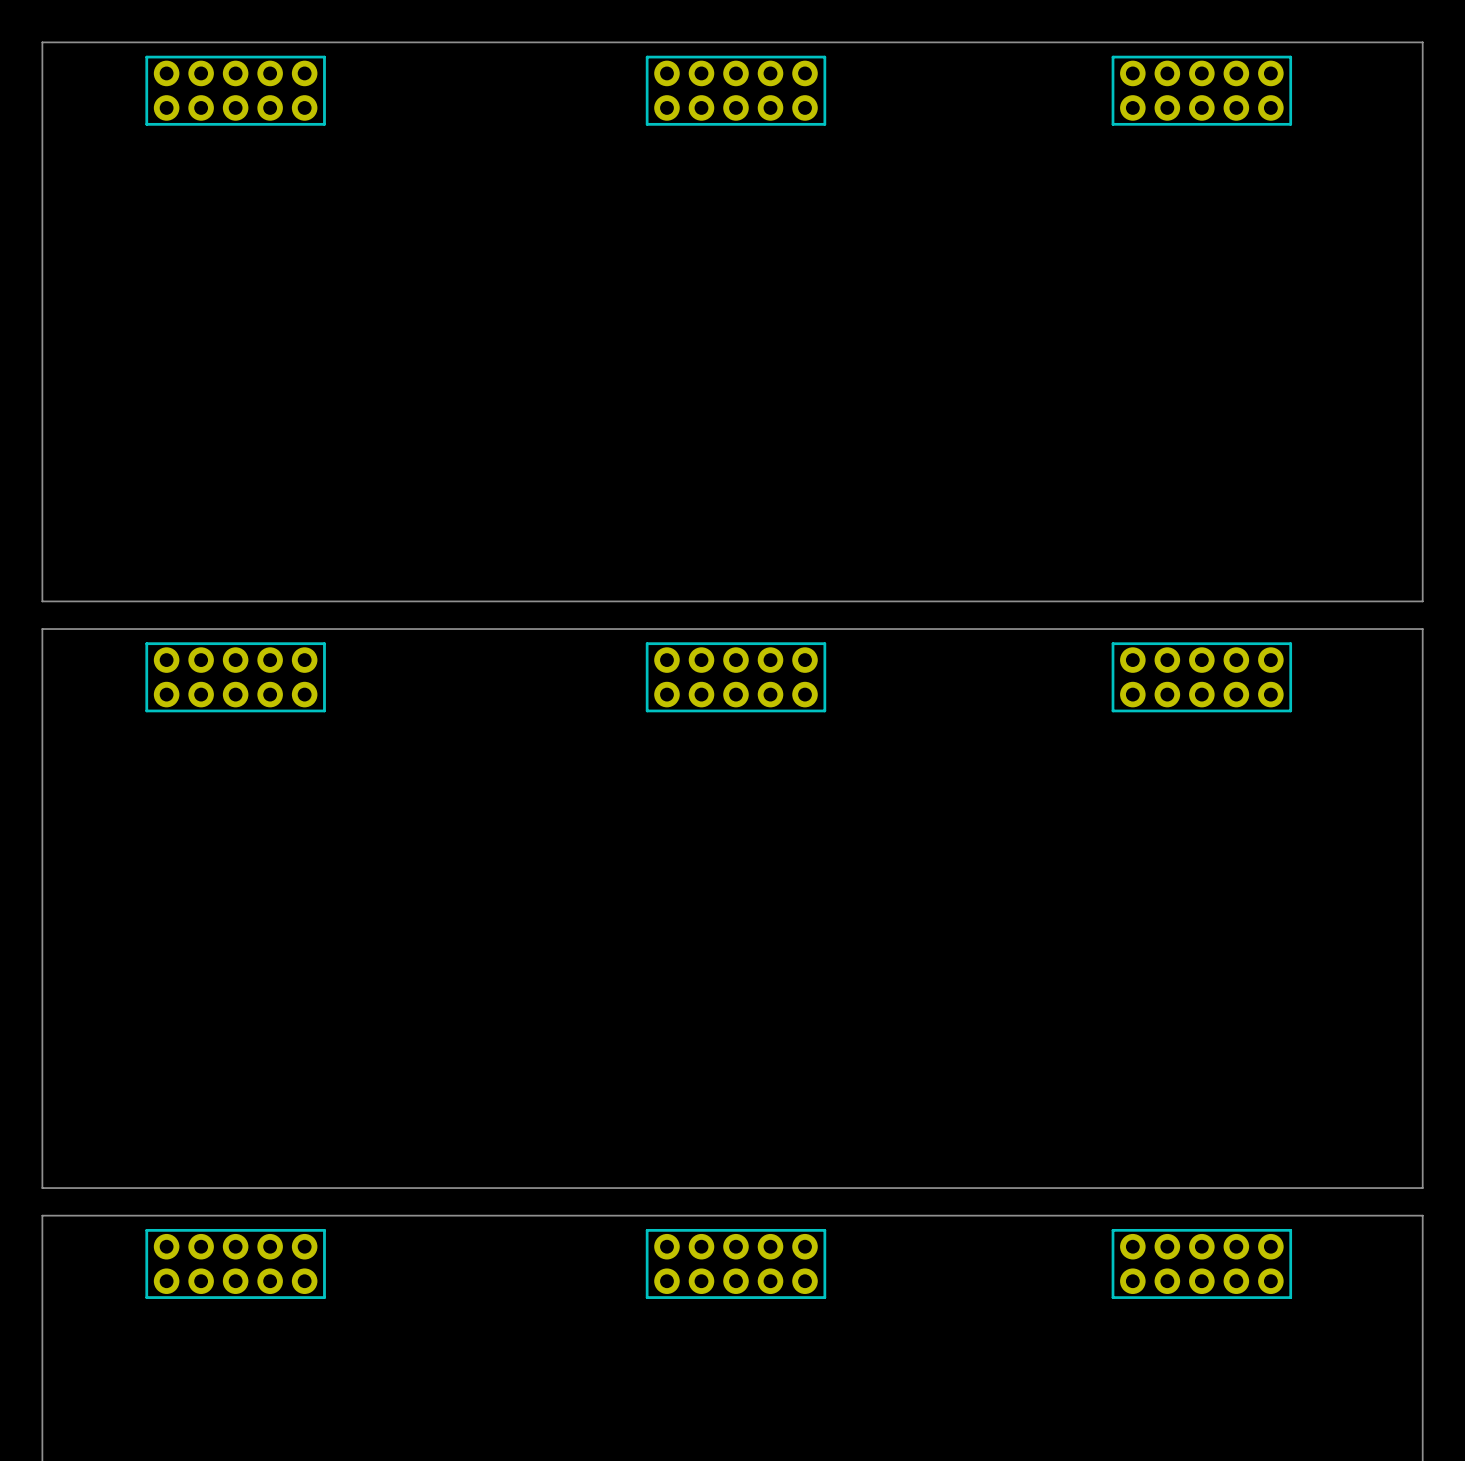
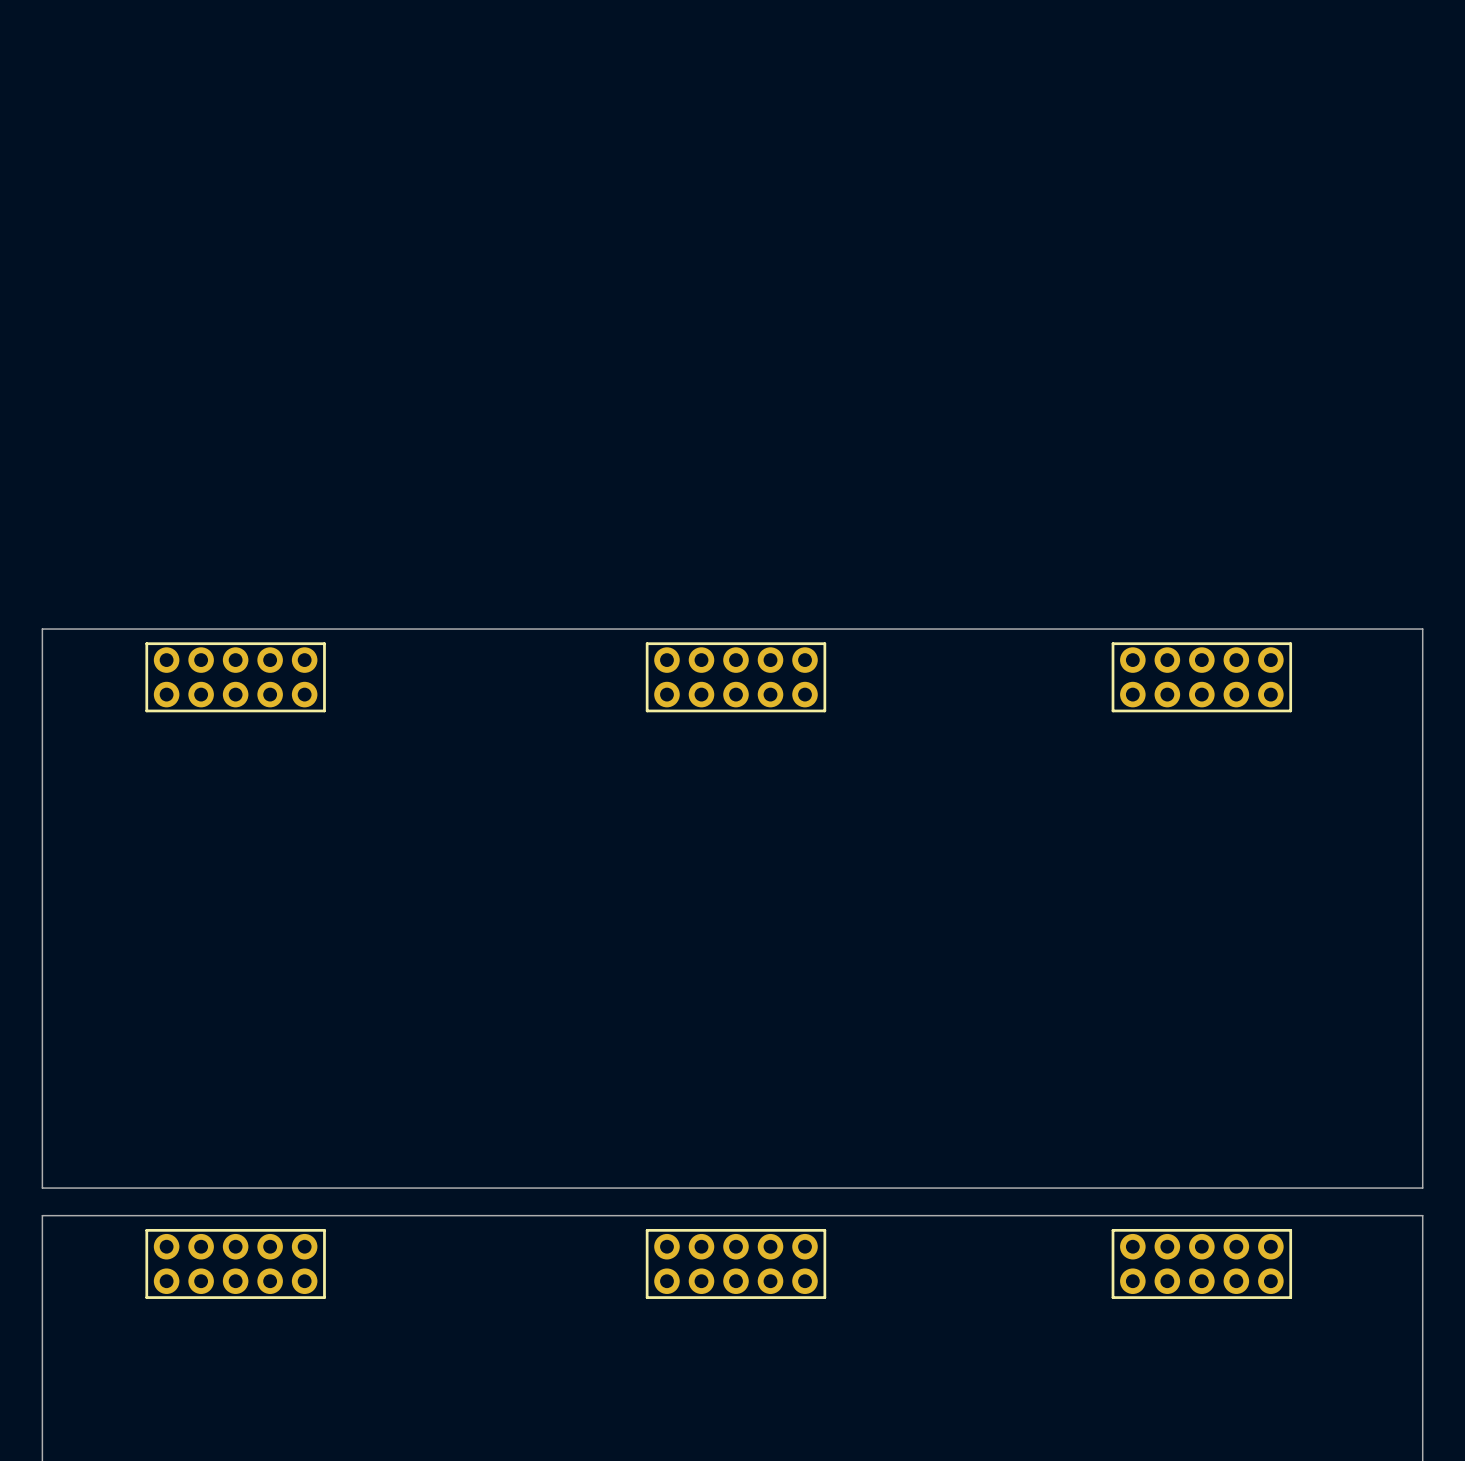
part: (732, 321) -> none

